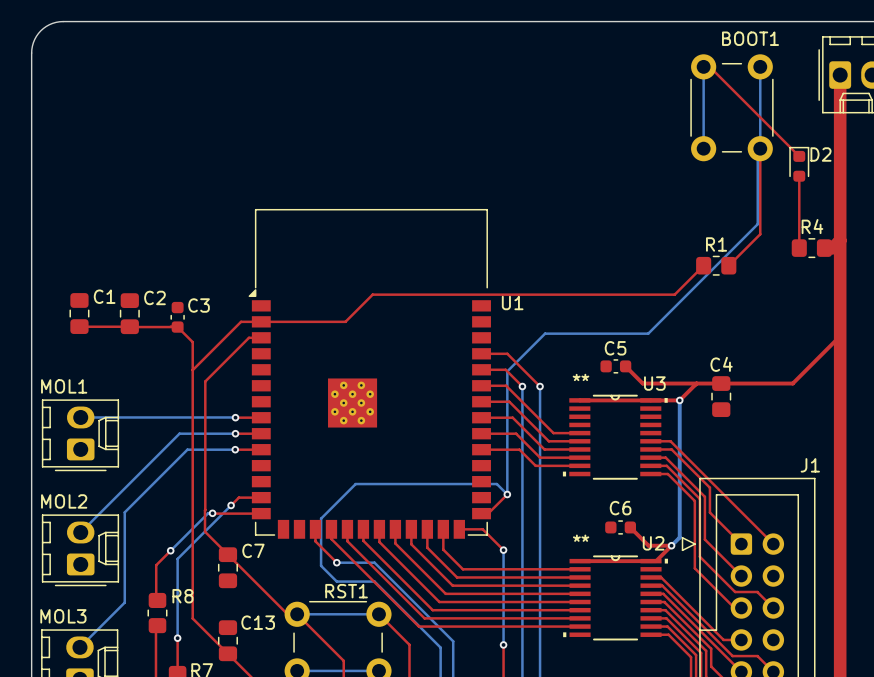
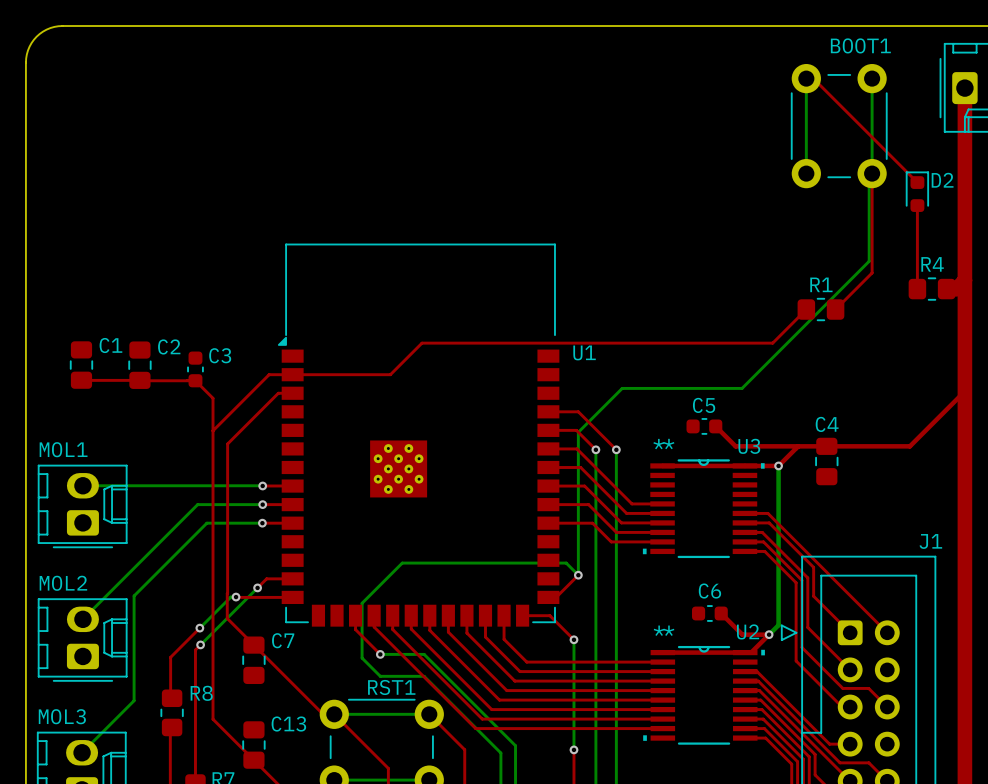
top track: none -> (199, 628) (187, 640)
bottom track: (181, 540) (170, 550) -> none
via: none -> (199, 628)
via: (170, 550) -> none
top track: none -> (200, 644) (195, 650) (195, 742)
bottom track: (182, 554) (177, 558) (177, 638) -> none
via: none -> (200, 644)
via: (177, 638) -> none

